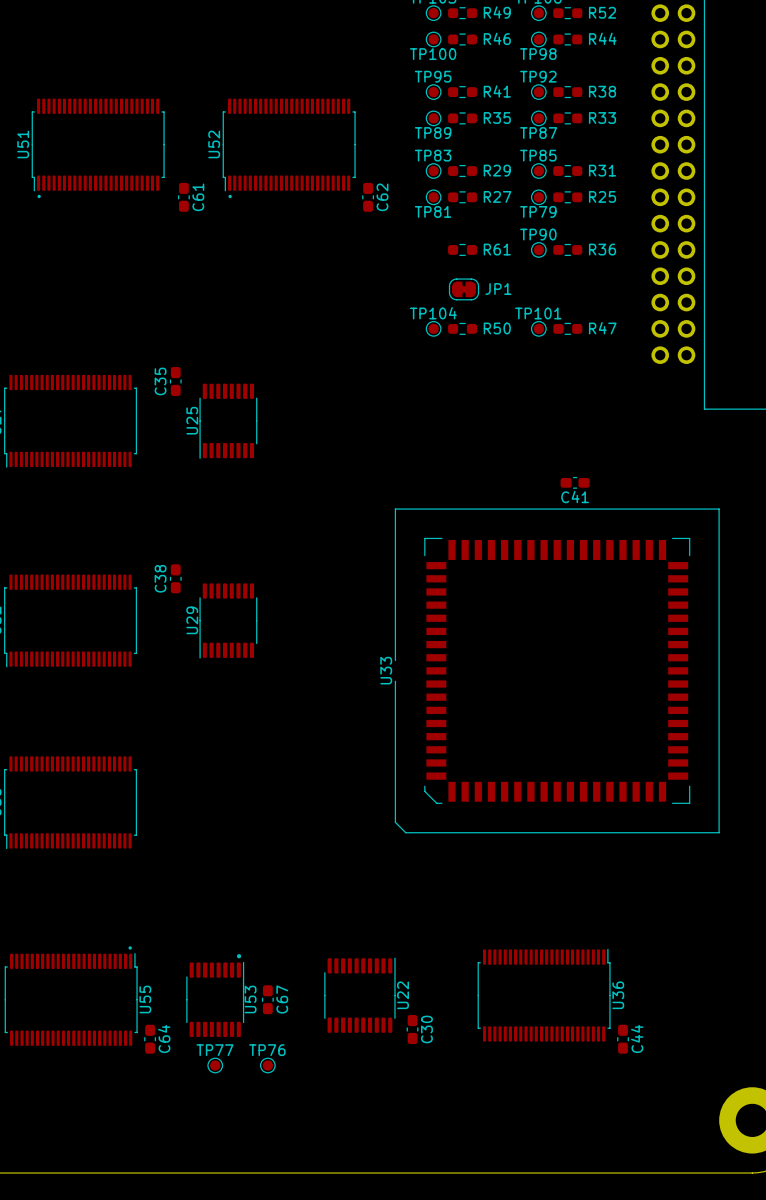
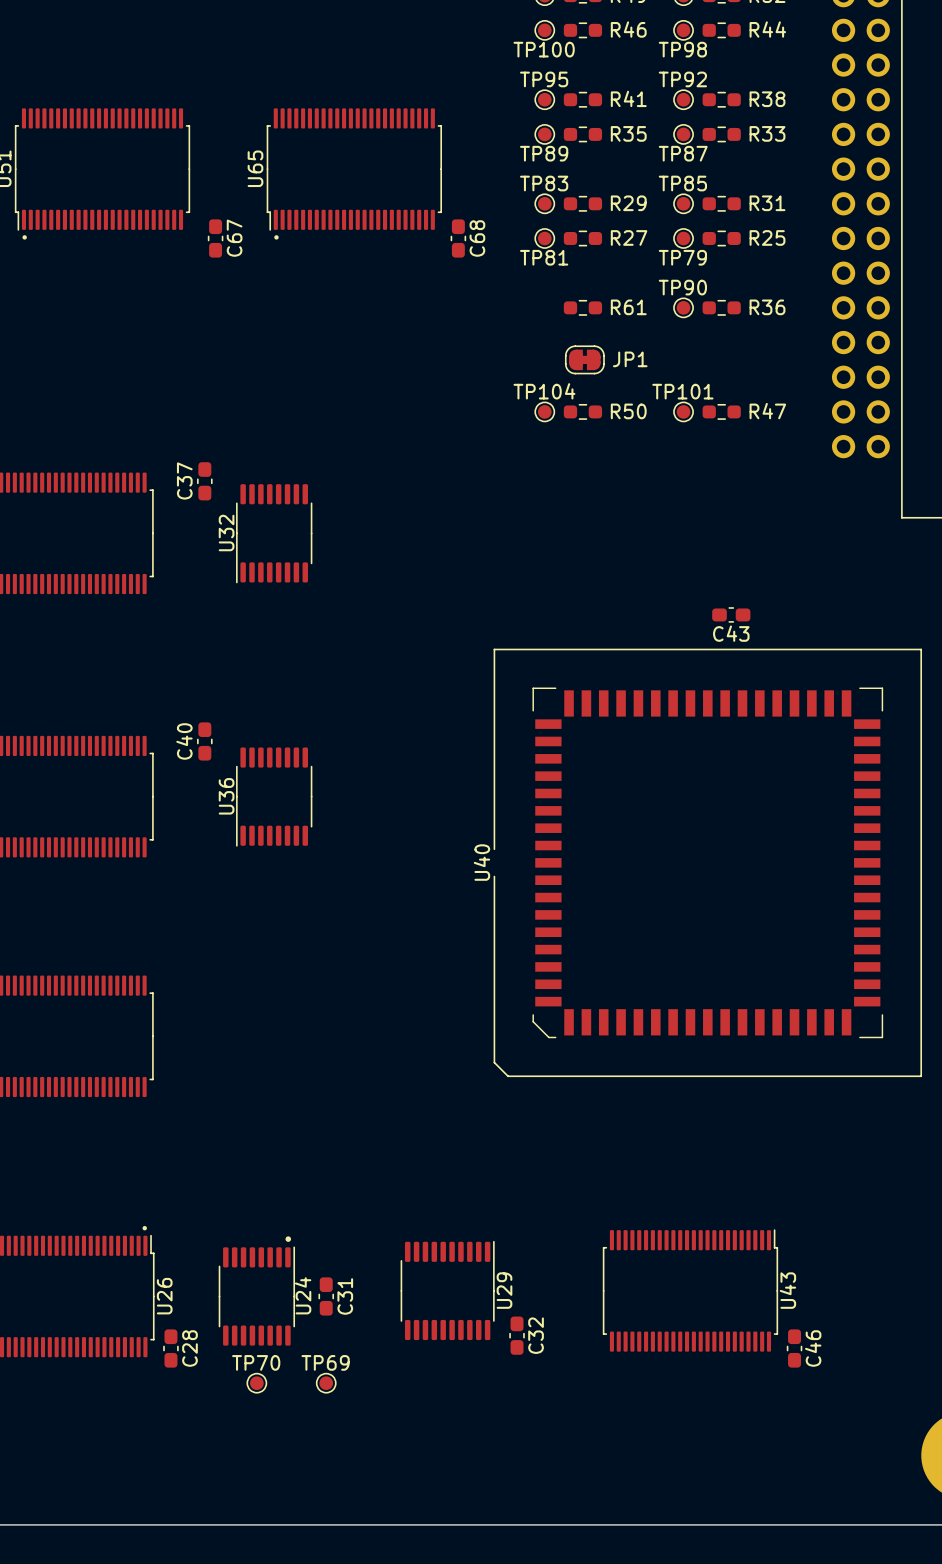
U52 name: U52 (214, 144) -> U65 (255, 168)
C61 name: C61 (198, 197) -> C67 (234, 238)
C62 name: C62 (382, 197) -> C68 (477, 238)
C35 name: C35 (160, 381) -> C37 (184, 480)
U25 name: U25 (192, 420) -> U32 (226, 533)
C41 name: C41 (575, 497) -> C43 (731, 633)
C38 name: C38 (160, 578) -> C40 (184, 741)
U29 name: U29 (192, 620) -> U36 (226, 796)
U33 name: U33 (386, 670) -> U40 (481, 862)
U22 name: U22 (403, 995) -> U29 (504, 1290)
U36 name: U36 (618, 995) -> U43 (787, 1290)
U55 name: U55 (145, 999) -> U26 (164, 1296)
U53 name: U53 (250, 999) -> U24 (303, 1295)
C67 name: C67 (282, 999) -> C31 (345, 1296)
C30 name: C30 (426, 1029) -> C32 (536, 1335)
C64 name: C64 (164, 1038) -> C28 (189, 1348)
C44 name: C44 (637, 1038) -> C46 (813, 1348)
TP77 name: TP77 (214, 1050) -> TP70 (256, 1362)
TP76 name: TP76 (267, 1050) -> TP69 (325, 1362)

